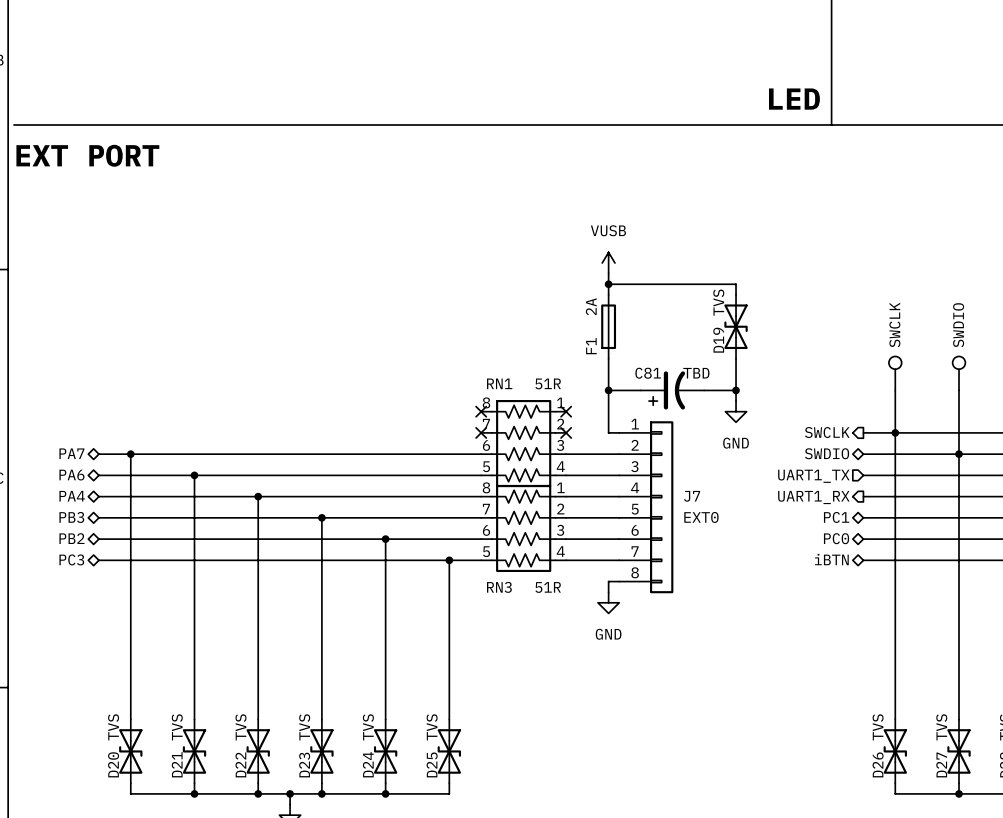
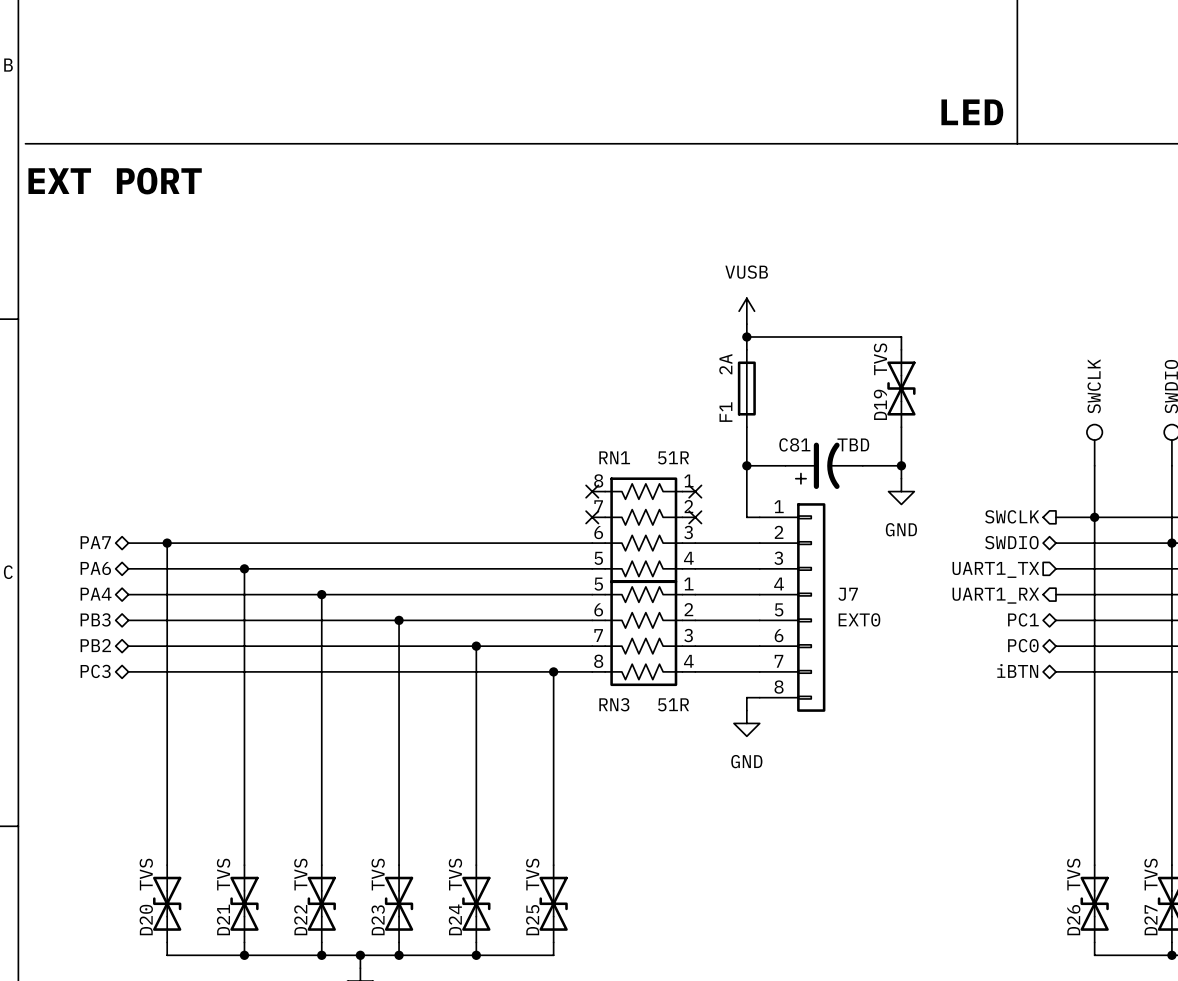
RN3 pin number: 8 (486, 487) -> 5 (598, 584)
RN3 pin number: 7 (486, 509) -> 6 (598, 609)
RN3 pin number: 6 (486, 530) -> 7 (598, 635)
RN3 pin number: 5 (486, 551) -> 8 (598, 661)

